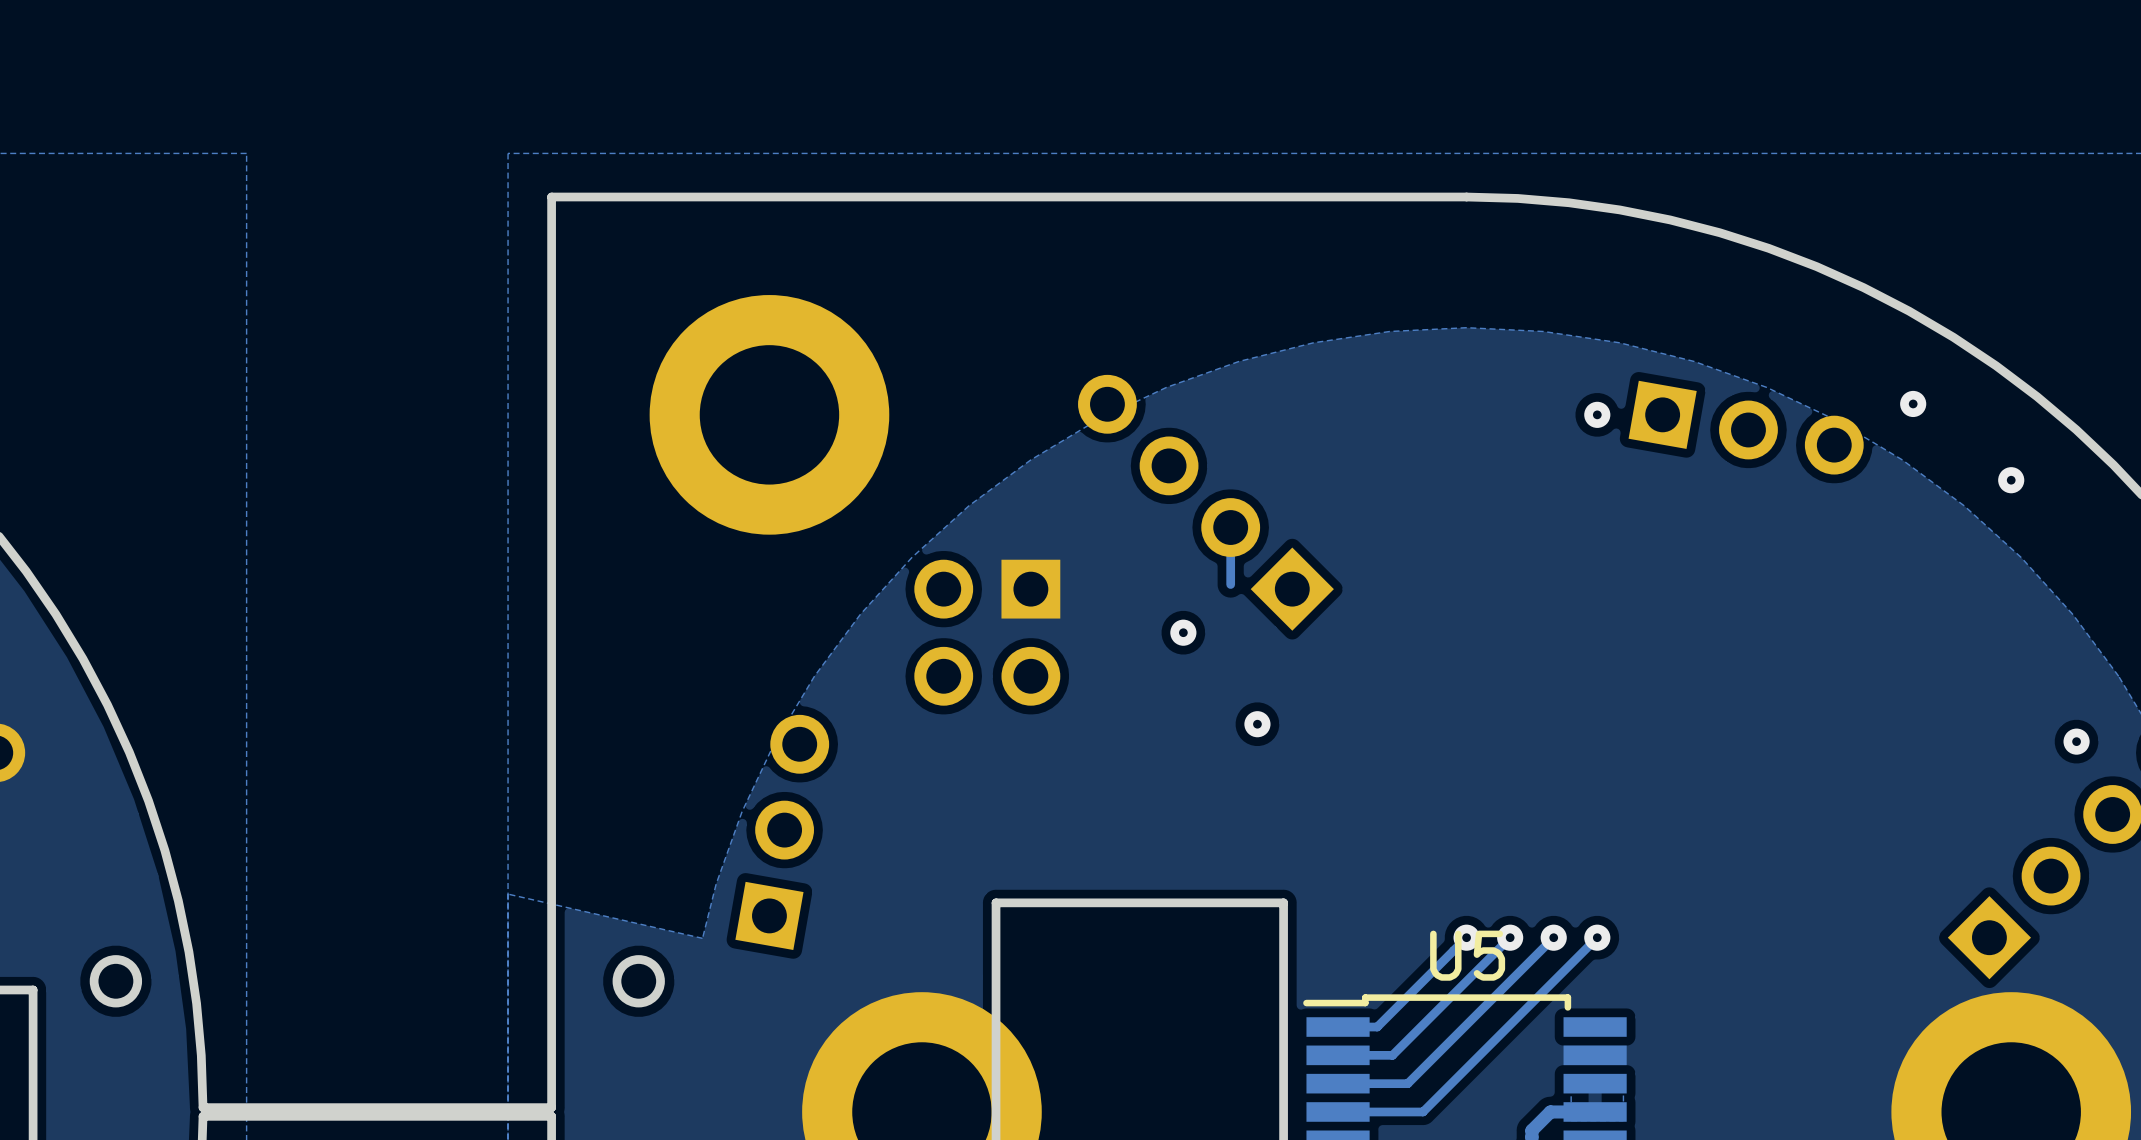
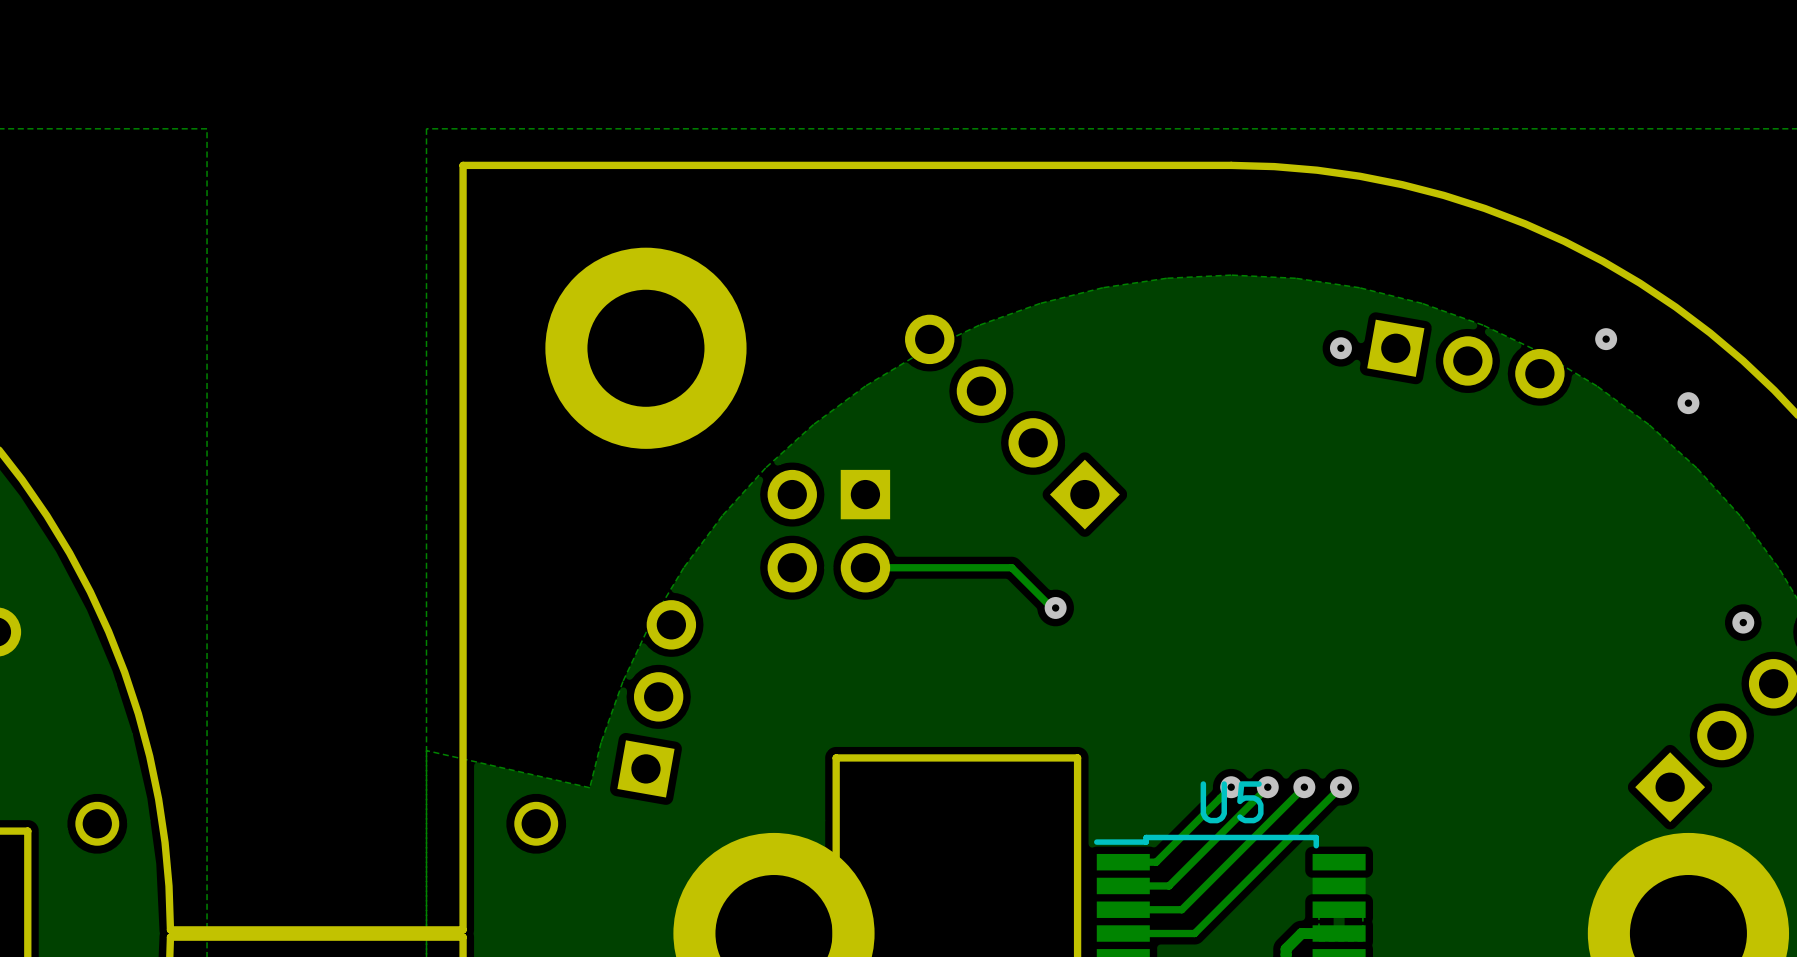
track: (1230, 527) (1230, 584) -> none
via: (1183, 632) -> none
track: none -> (865, 567) (1011, 567) (1048, 604)

